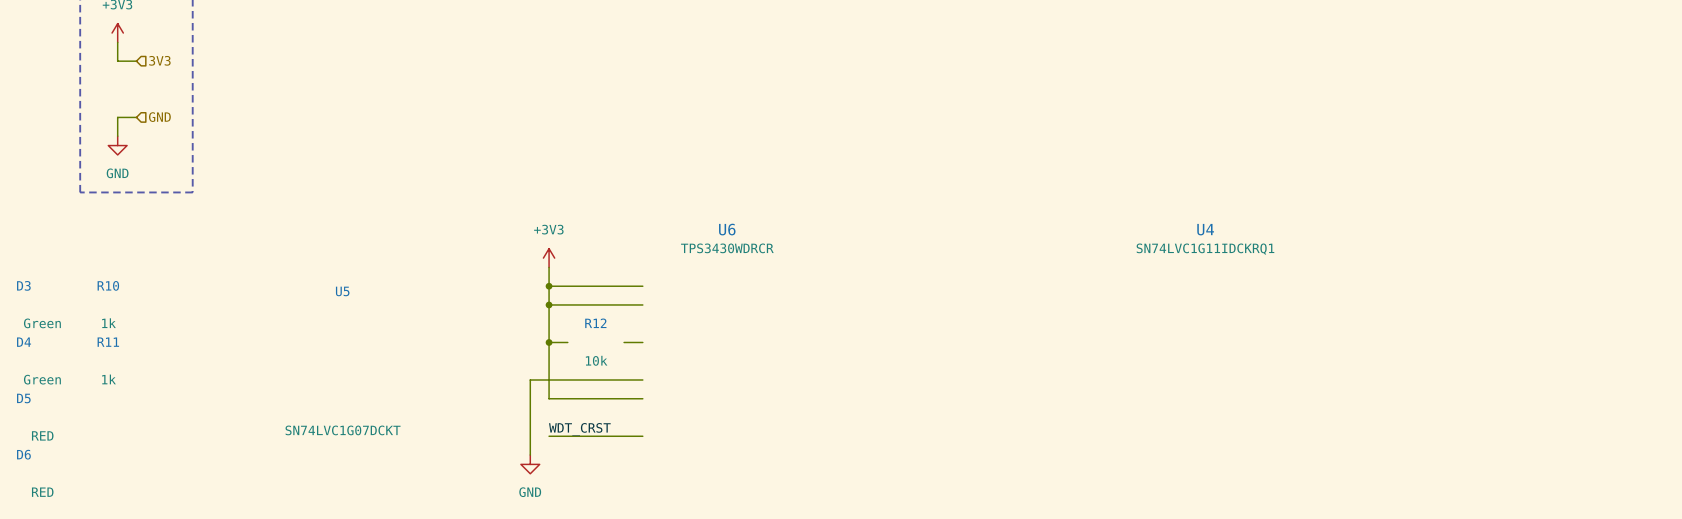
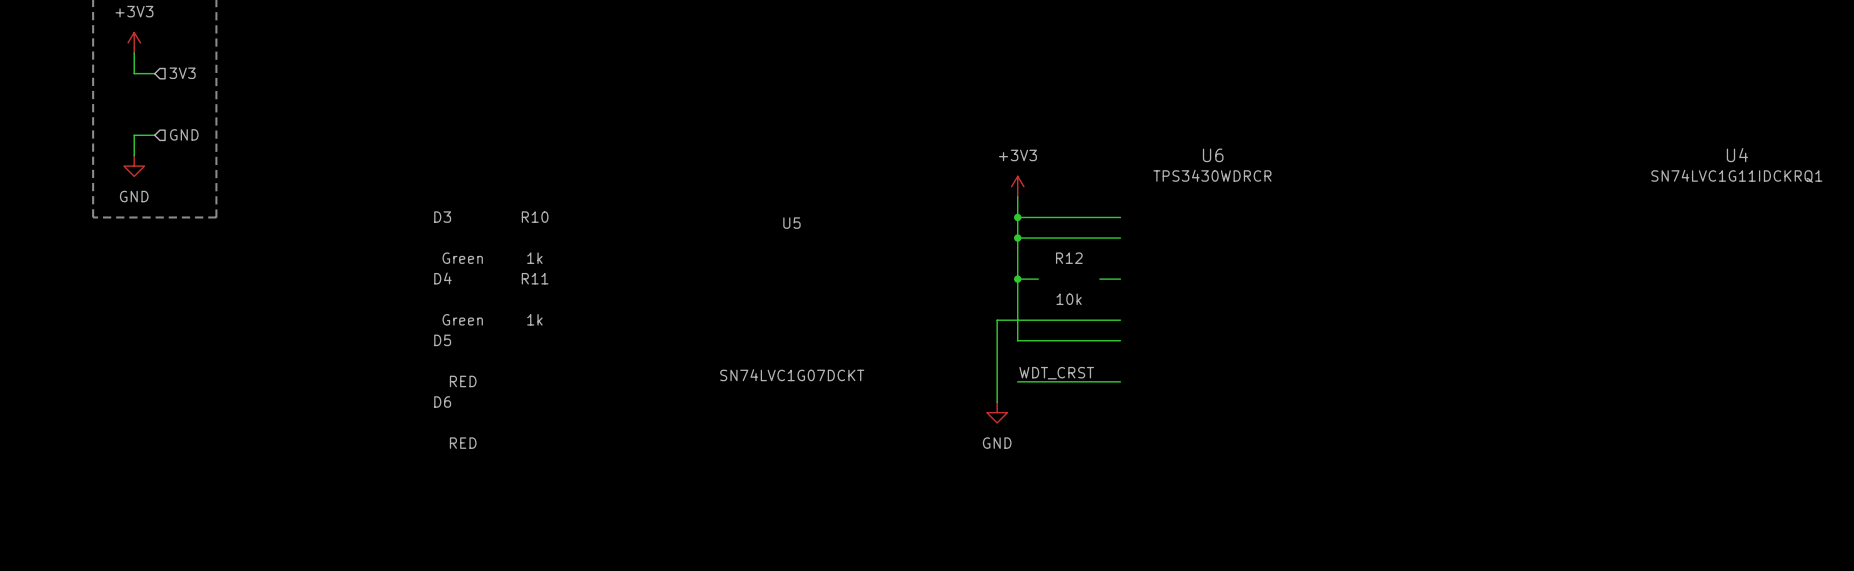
power symbol: none -> +3V3 (1017, 186)
wire: none -> (1017, 196) (1017, 340) (1120, 340)
wire: none -> (1017, 217) (1120, 217)
junction: none -> (1017, 217)
wire: none -> (1017, 238) (1120, 238)
junction: none -> (1017, 238)
U6 position: (727, 238) -> (1212, 165)
U4 position: (1205, 239) -> (1736, 165)
wire: none -> (1017, 279) (1038, 279)
junction: none -> (1017, 279)
wire: none -> (1099, 279) (1120, 279)
power symbol: +3V3 (549, 258) -> none
wire: (549, 267) (549, 398) (642, 398) -> none
wire: (549, 286) (642, 286) -> none
junction: (549, 286) -> none
wire: none -> (1120, 320) (997, 320) (997, 402)
D3 position: (38, 304) -> (458, 237)
R10 position: (108, 304) -> (535, 237)
wire: (549, 304) (642, 304) -> none
junction: (549, 304) -> none
label: none -> WDT_CRST (1056, 373)
wire: (549, 342) (567, 342) -> none
junction: (549, 342) -> none
R12 position: (596, 342) -> (1069, 278)
wire: (624, 342) (642, 342) -> none
wire: none -> (1017, 381) (1120, 381)
D4 position: (38, 360) -> (458, 299)
R11 position: (108, 360) -> (535, 299)
U5 position: (343, 360) -> (792, 299)
power symbol: none -> GND (997, 412)
wire: (642, 380) (530, 380) (530, 455) -> none
D5 position: (35, 417) -> (455, 360)
label: WDT_CRST (579, 429) -> none
wire: (549, 436) (642, 436) -> none
power symbol: GND (530, 464) -> none
D6 position: (35, 473) -> (455, 422)

